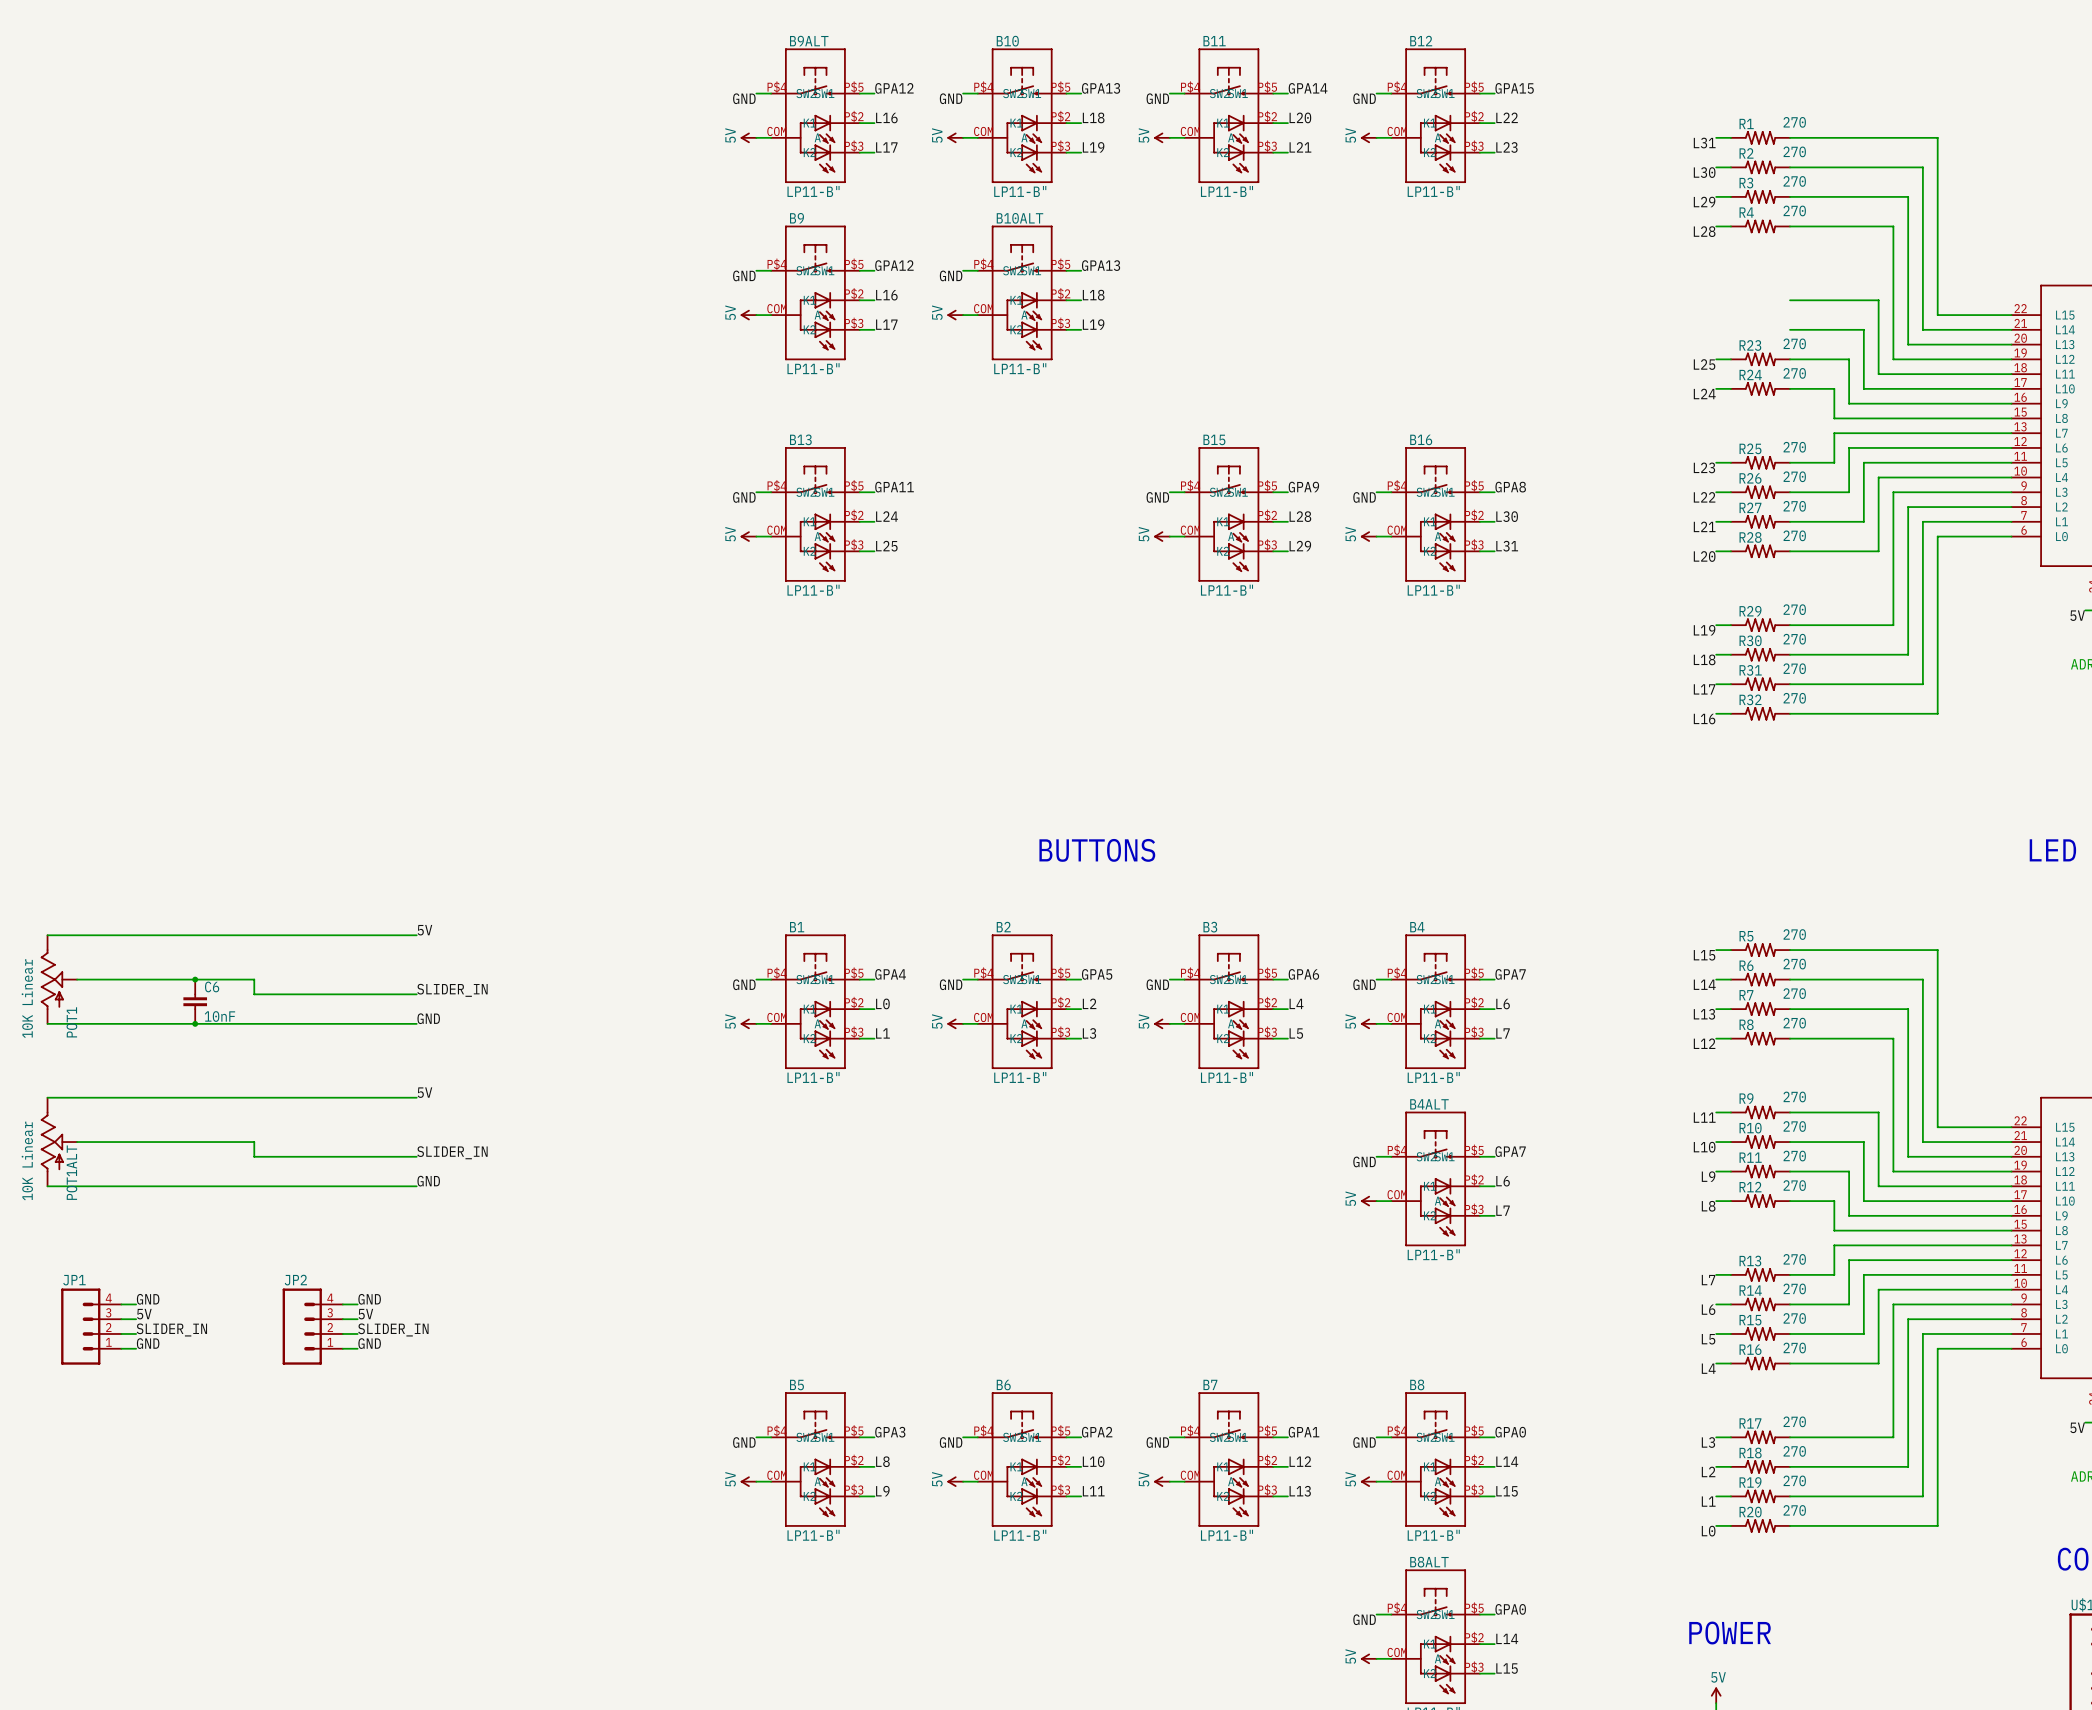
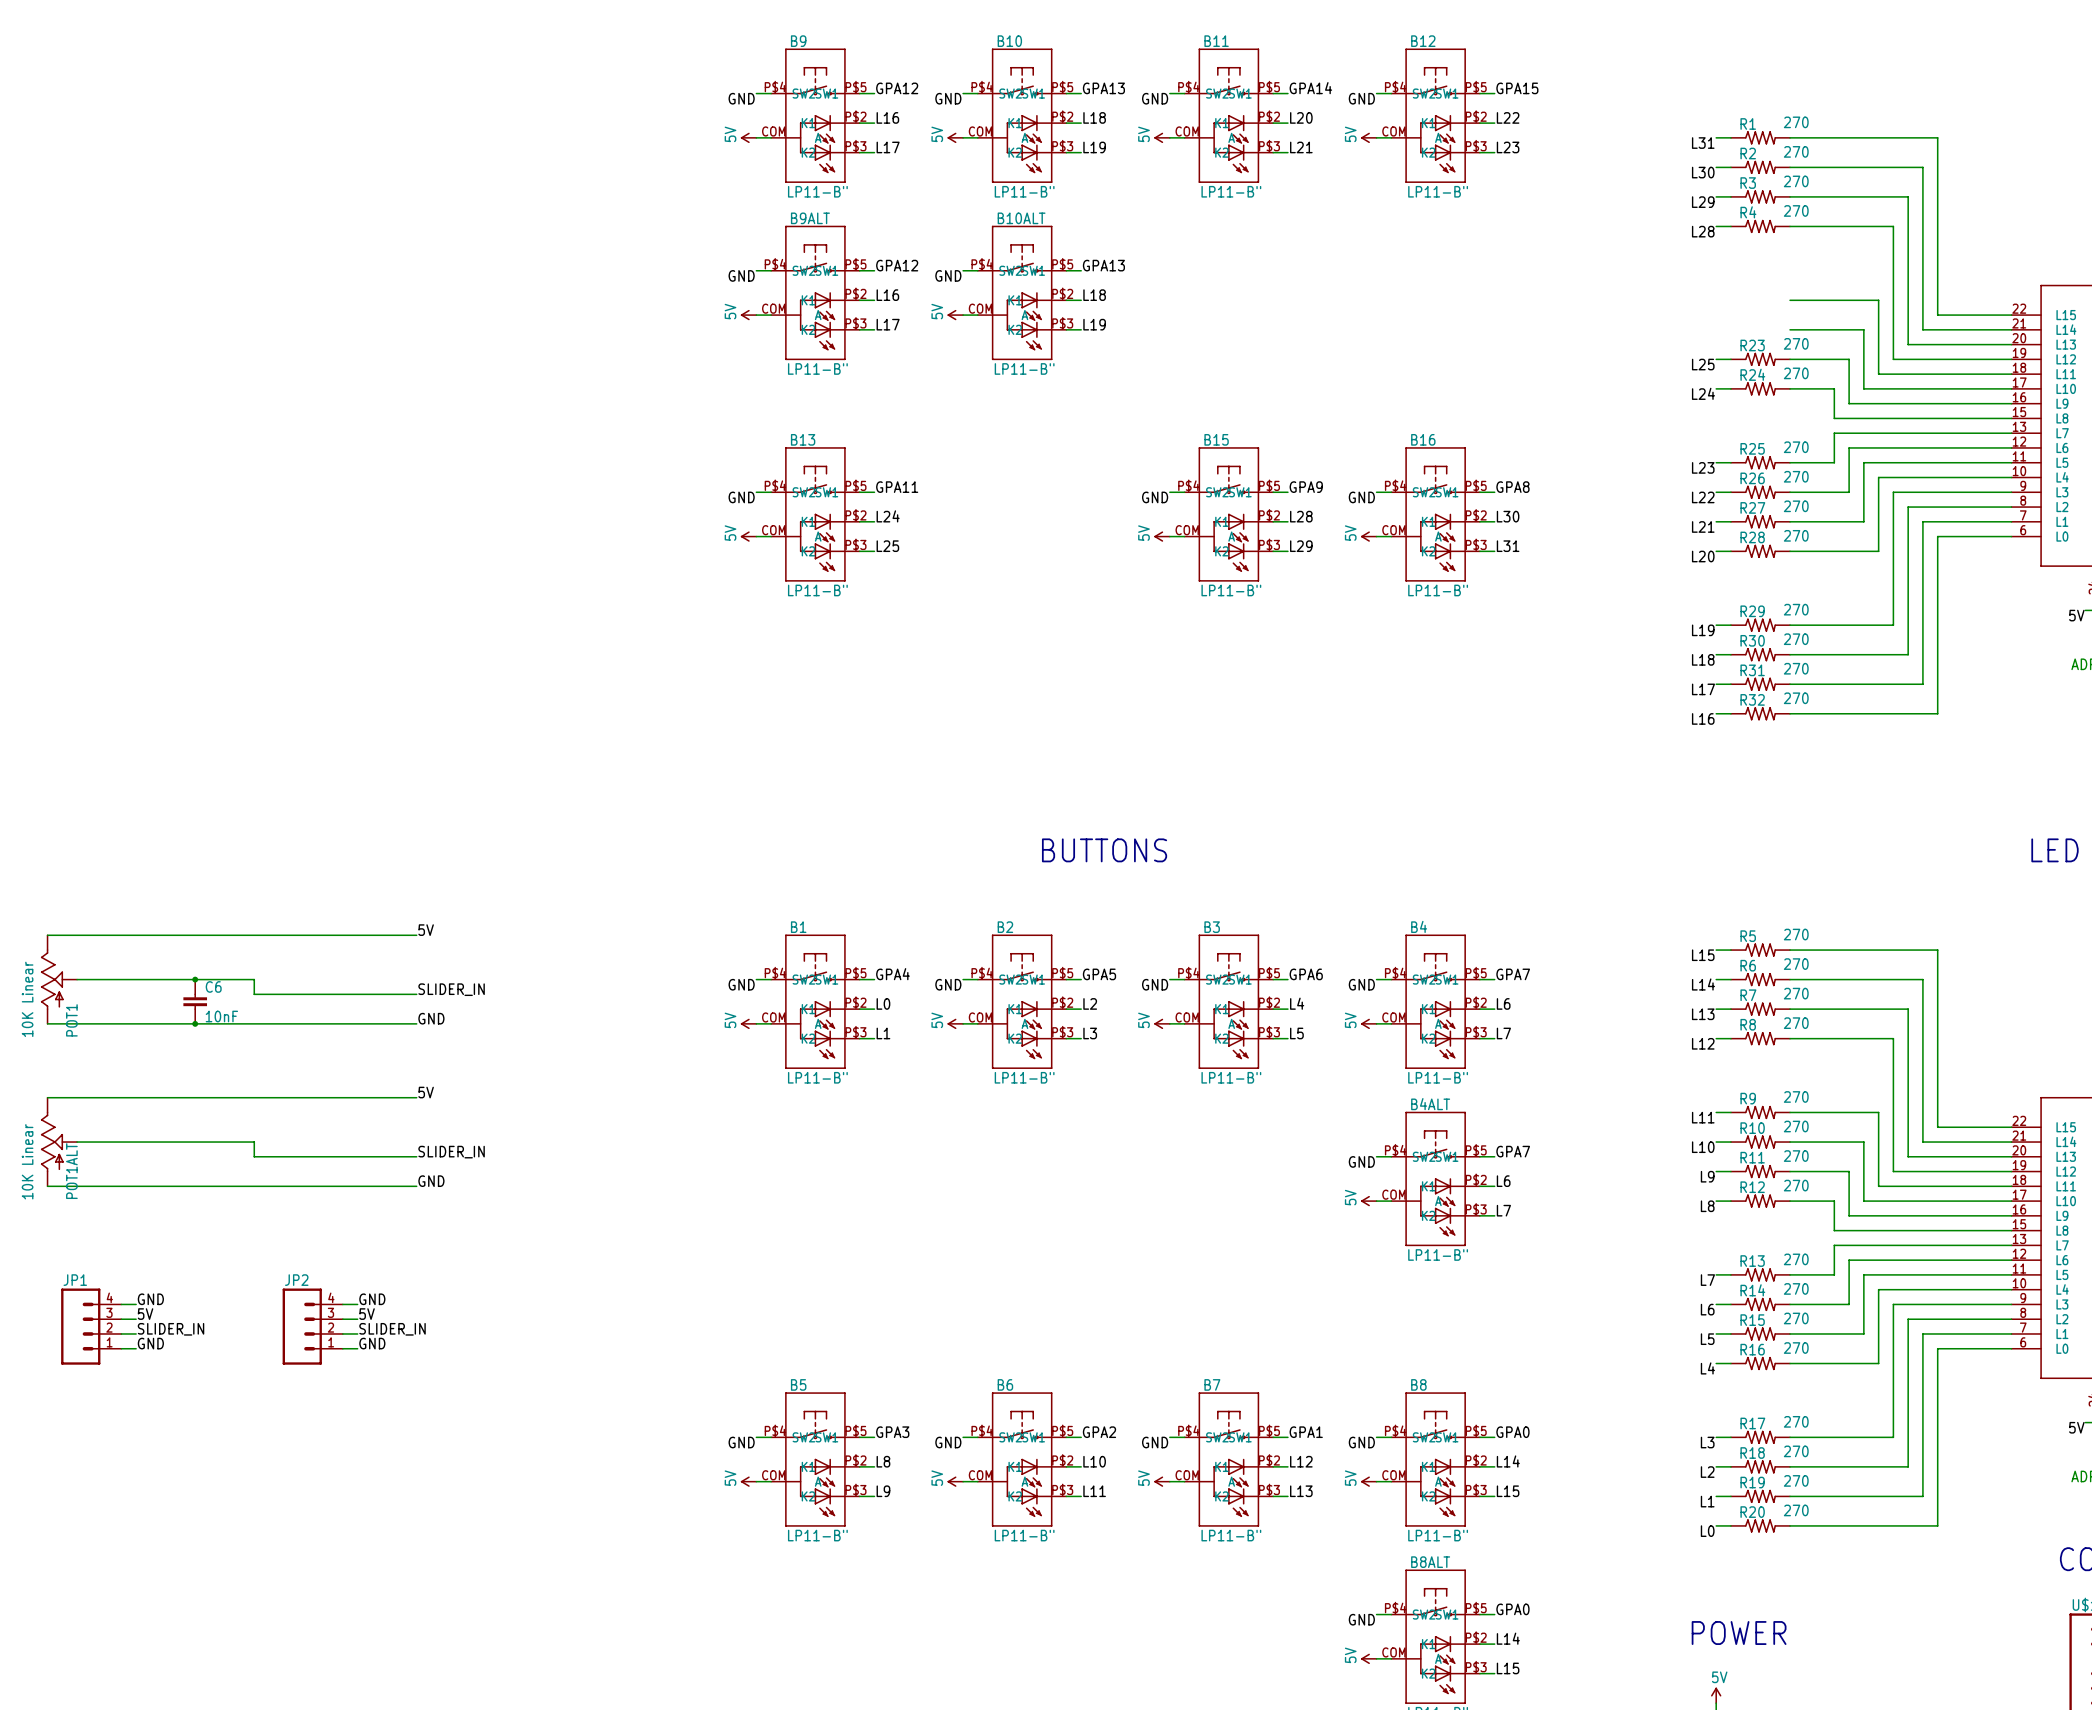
B9ALT name: B9ALT (809, 41) -> B9 (798, 41)
B9 name: B9 (796, 218) -> B9ALT (810, 218)

